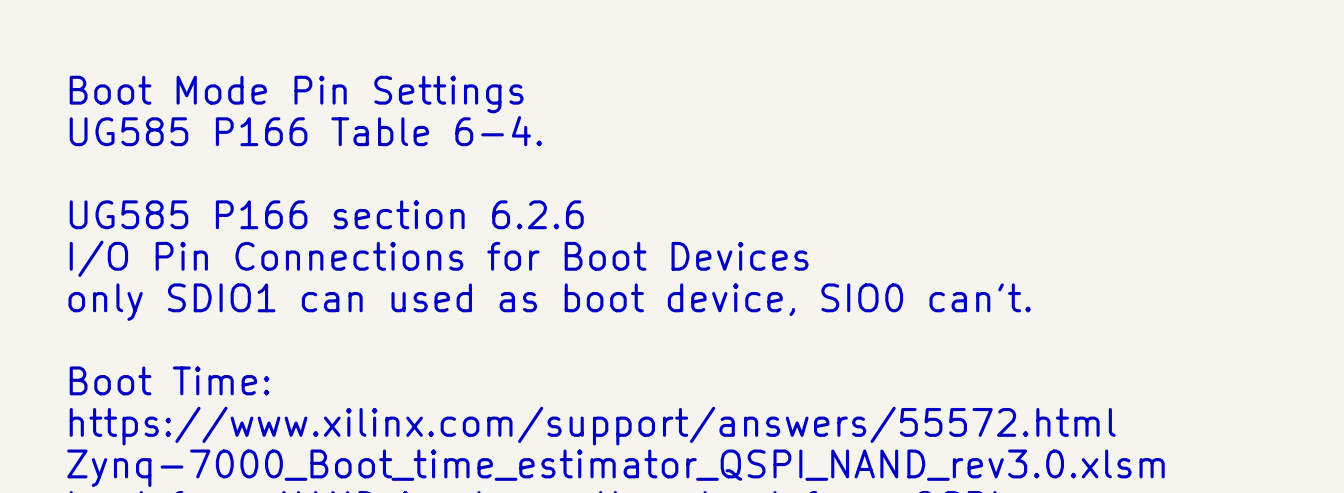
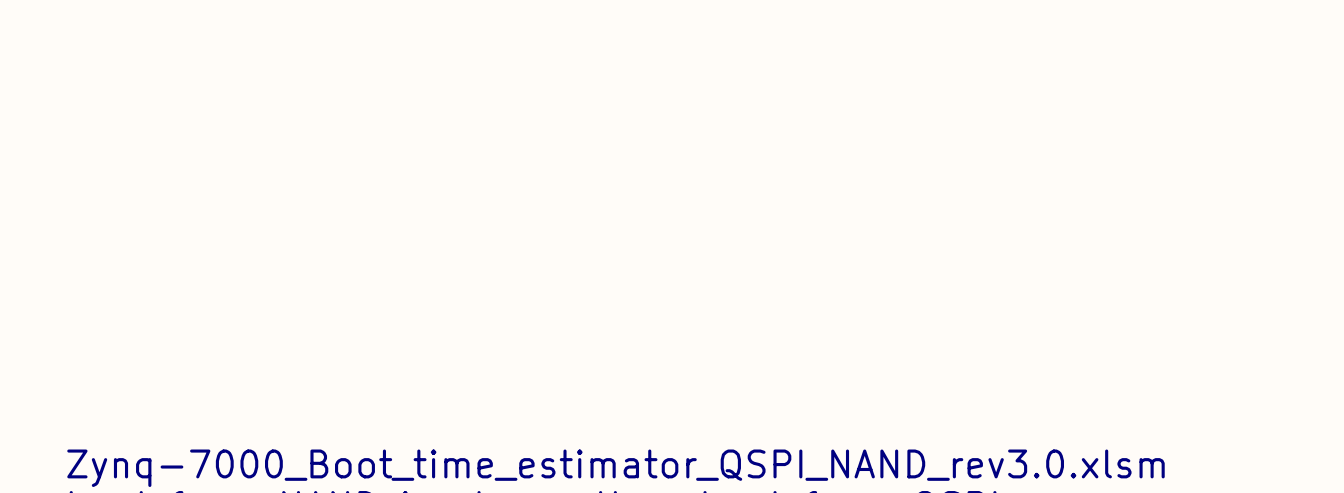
text: Boot Mode Pin Settings (296, 94) -> none
text: UG585 P166 Table 6-4. (305, 131) -> none
text: UG585 P166 section 6.2.6 (326, 214) -> none
text: I/O Pin Connections for Boot Devices (439, 258) -> none
text: only SDIO1 can used as boot device, SIO0 can't. (549, 302) -> none
text: Boot Time: (169, 380) -> none
text: https://www.xilinx.com/support/answers/55572.html (592, 426) -> none

